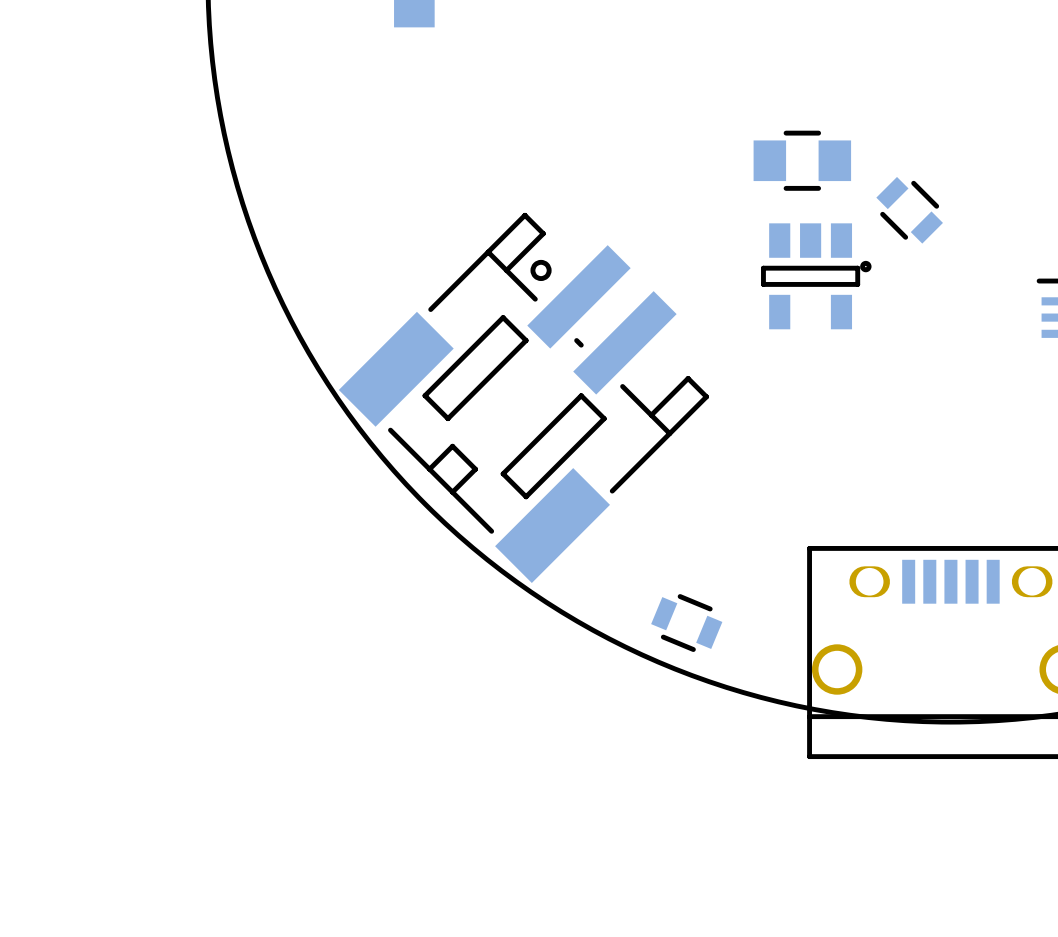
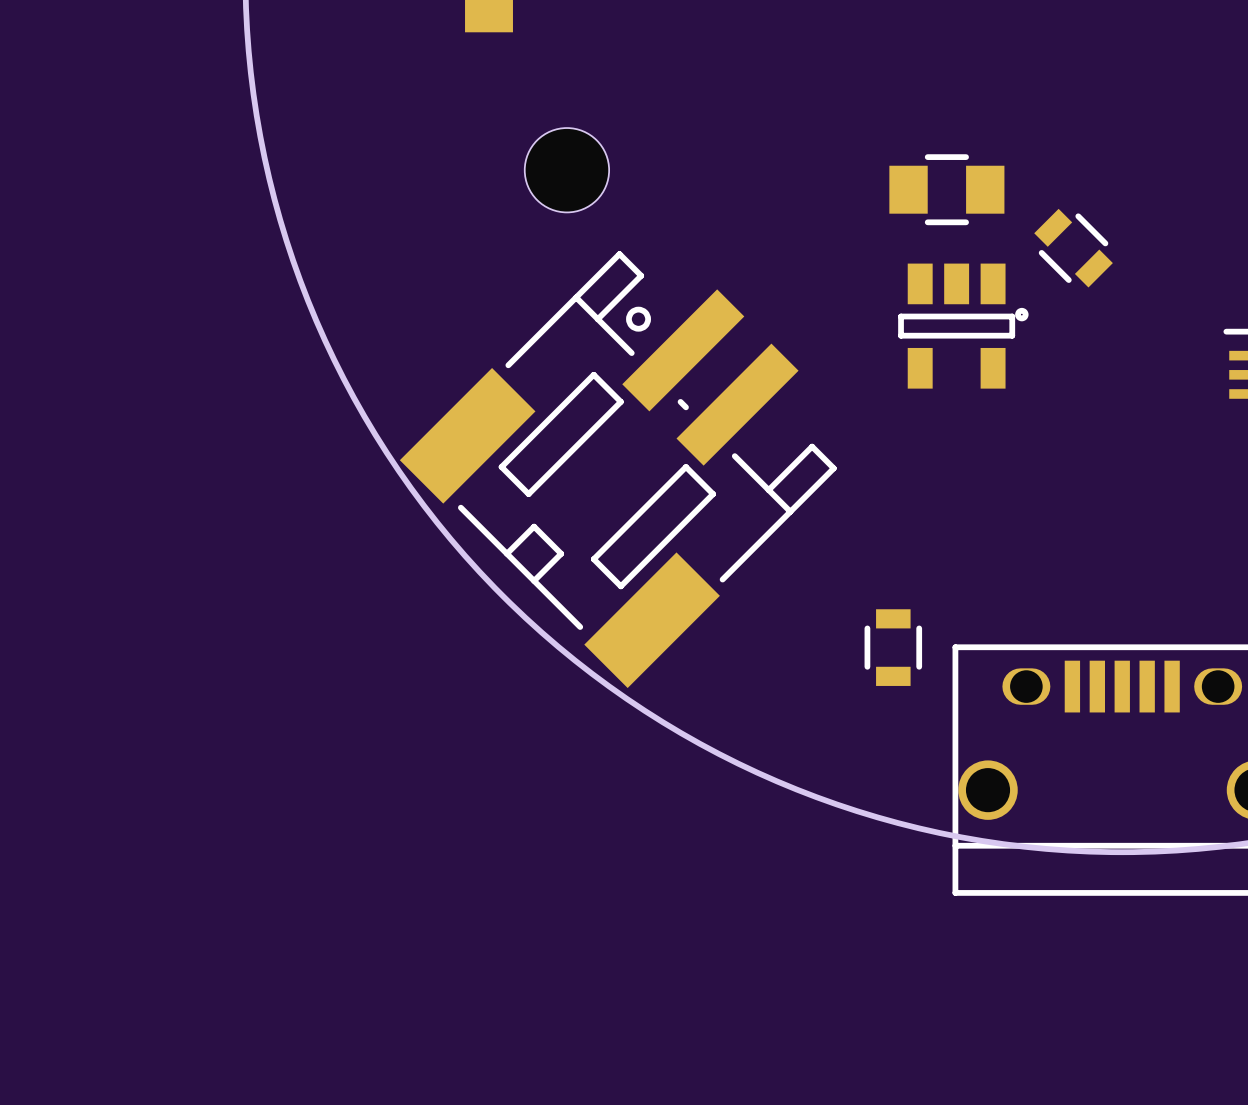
part: none -> (566, 170)
part: none -> (893, 647)
part: (686, 623) -> none

